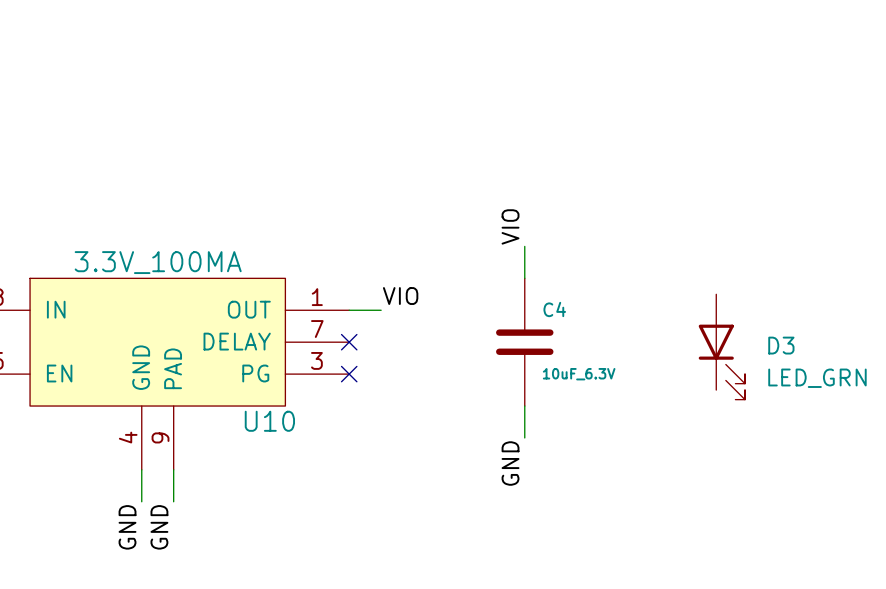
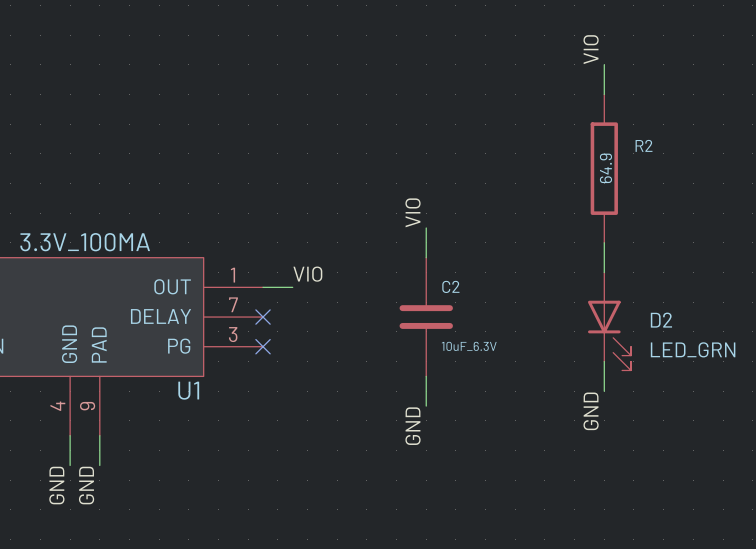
label: none -> VIO (591, 49)
wire: none -> (604, 64) (604, 94)
R2: none -> 64.9 (604, 168)
wire: none -> (604, 242) (604, 272)
C4 name: C4 (554, 309) -> C2 (450, 286)
D3 name: D3 (781, 345) -> D2 (661, 320)
wire: none -> (604, 361) (604, 391)
U10 name: U10 (269, 421) -> U1 (188, 390)
label: none -> GND (591, 411)

